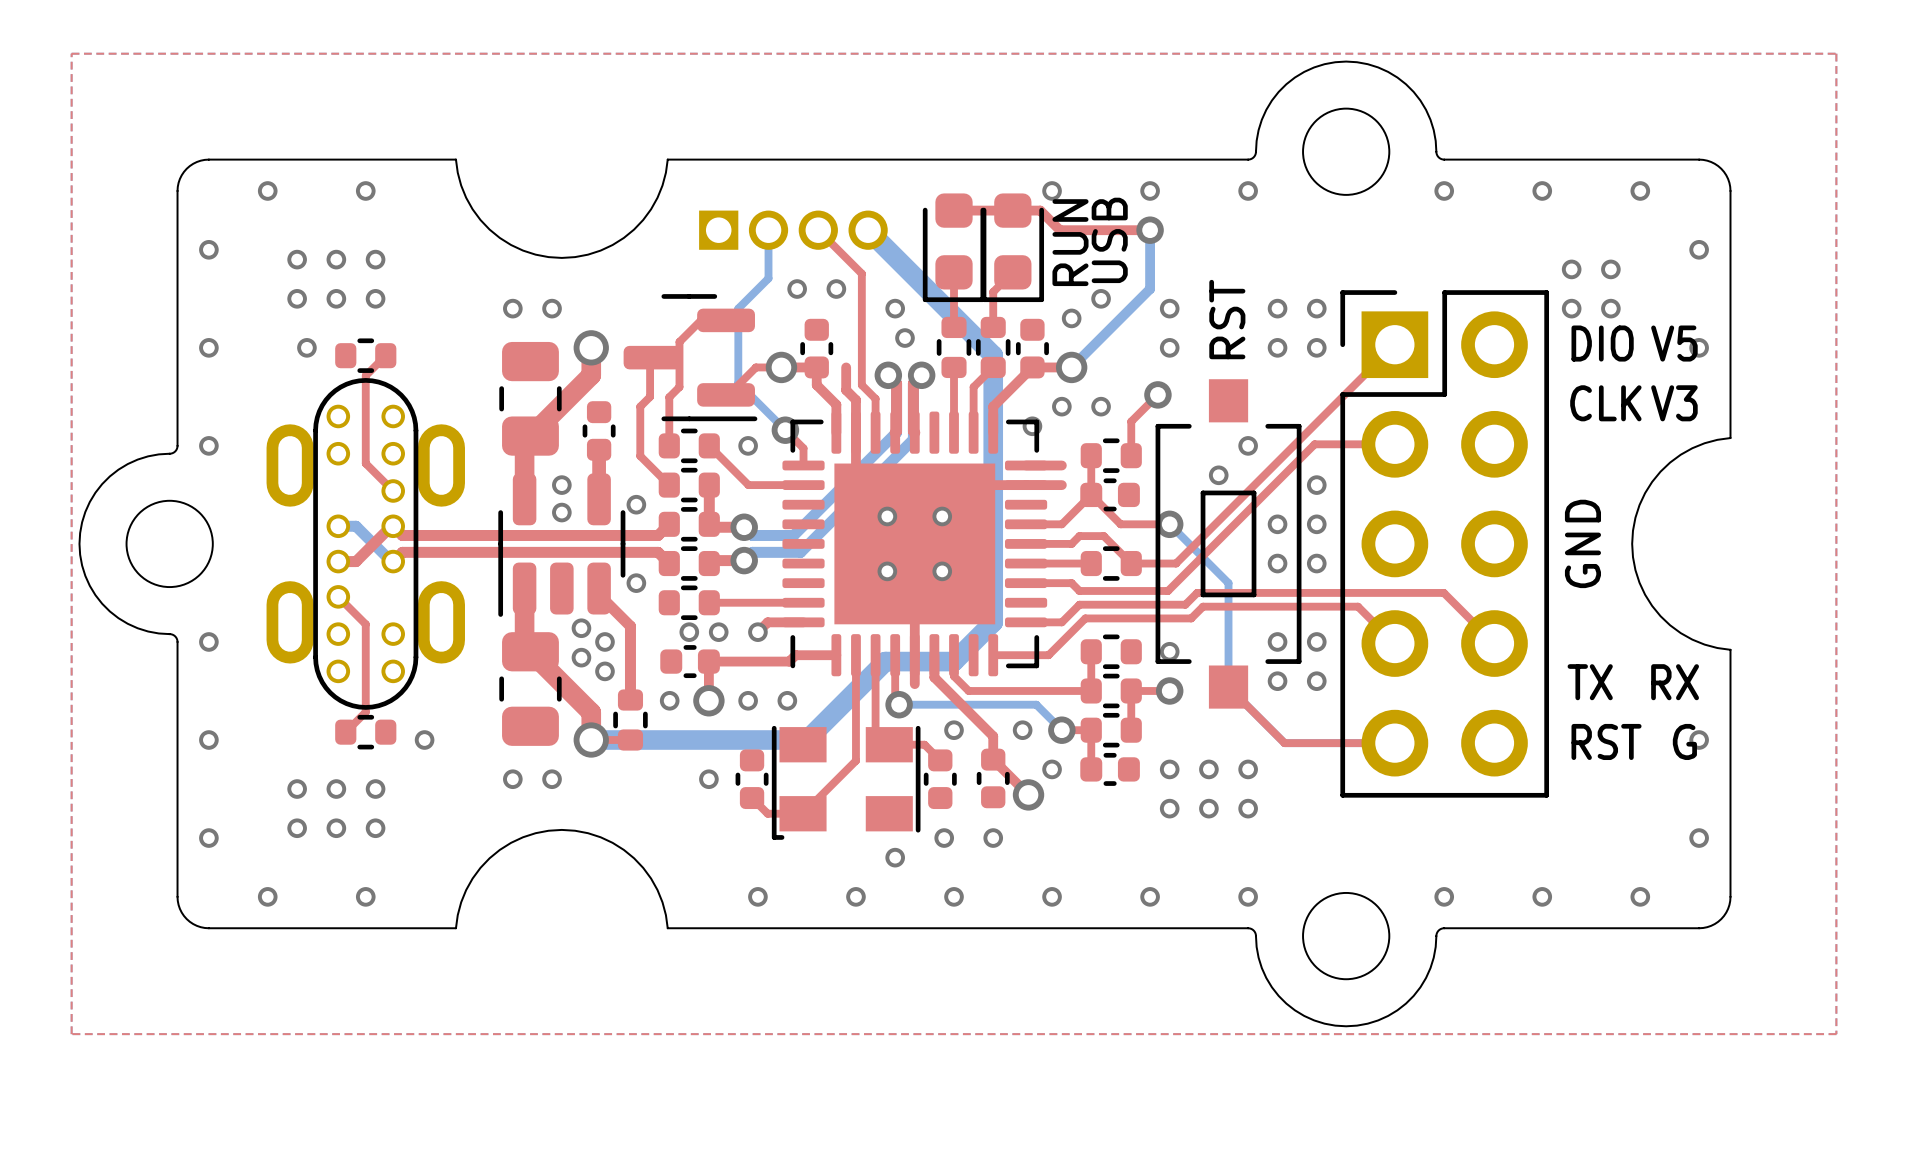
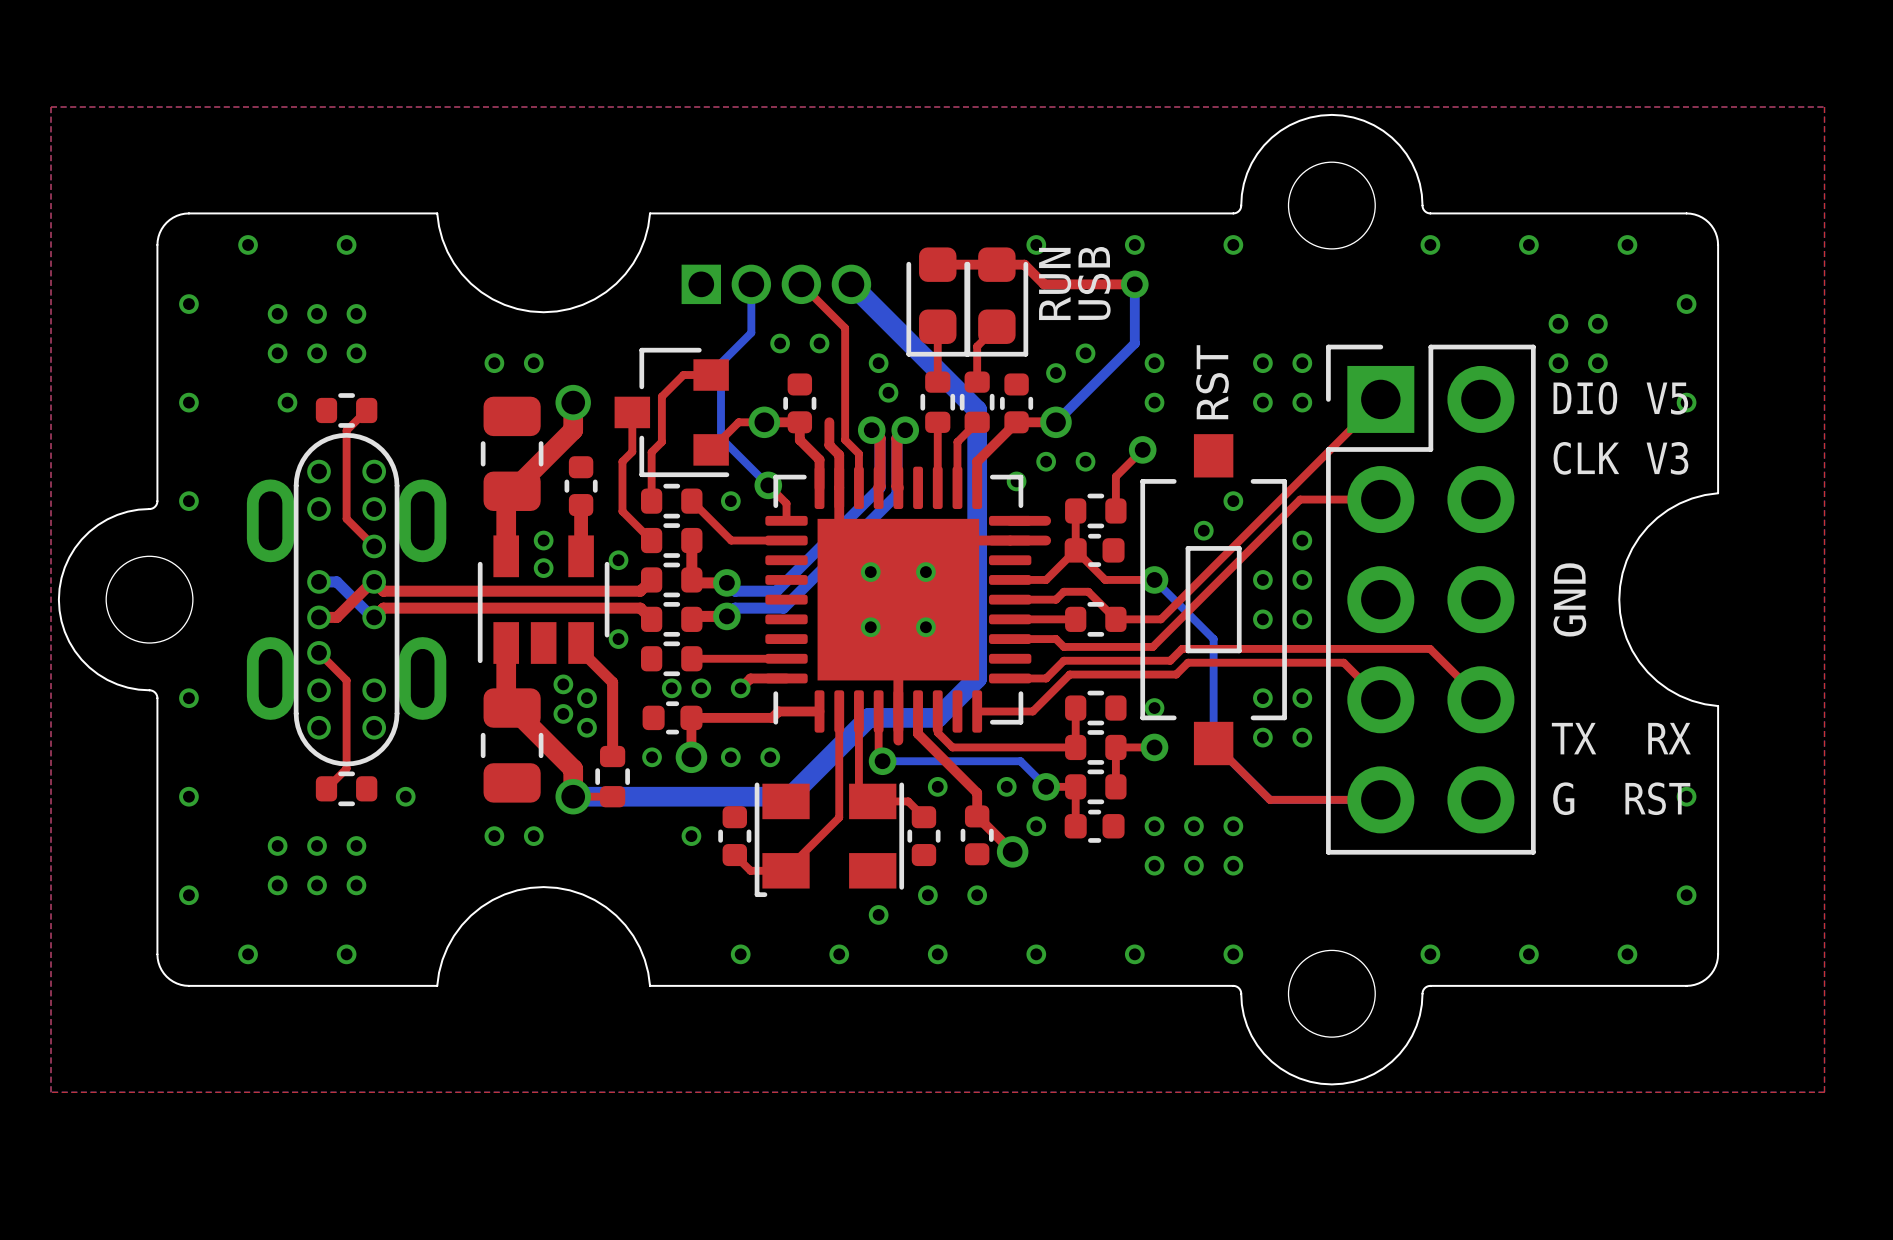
part footprint: [623, 294, 758, 422] -> [614, 347, 730, 478]
part footprint: [498, 473, 626, 617] -> [477, 535, 610, 664]
text: RST (1606, 741) -> G (1563, 798)
text: G (1684, 741) -> RST (1657, 798)

